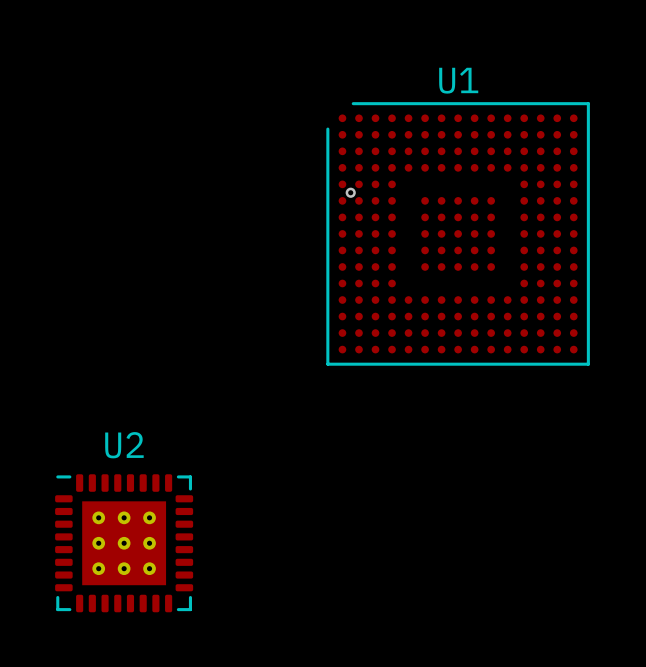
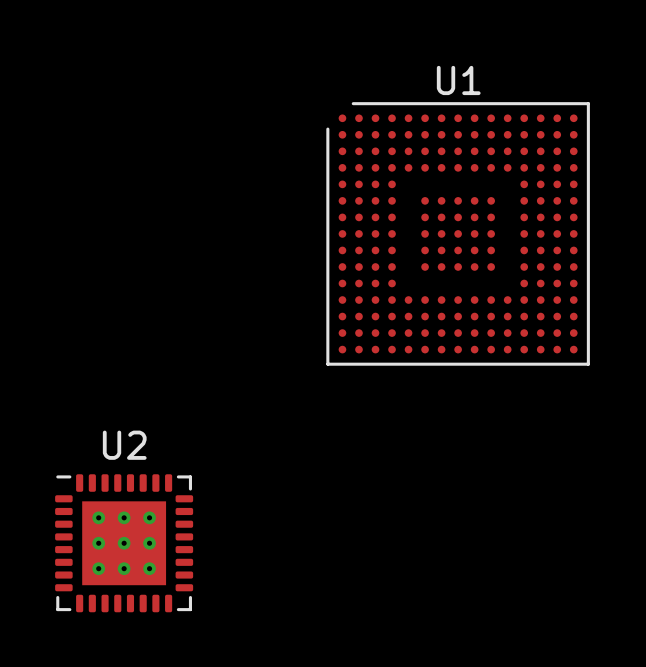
via: (350, 192) -> none

